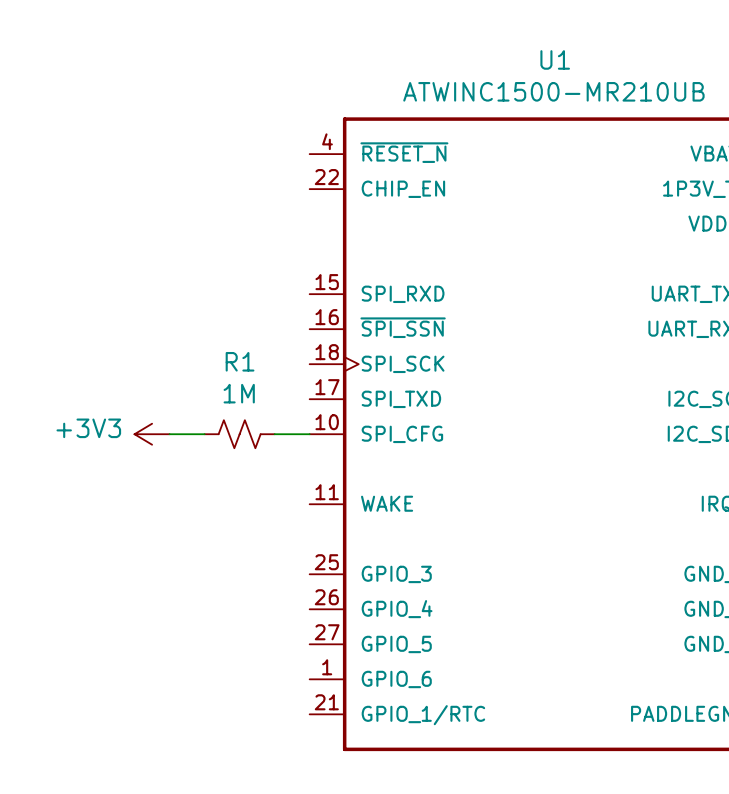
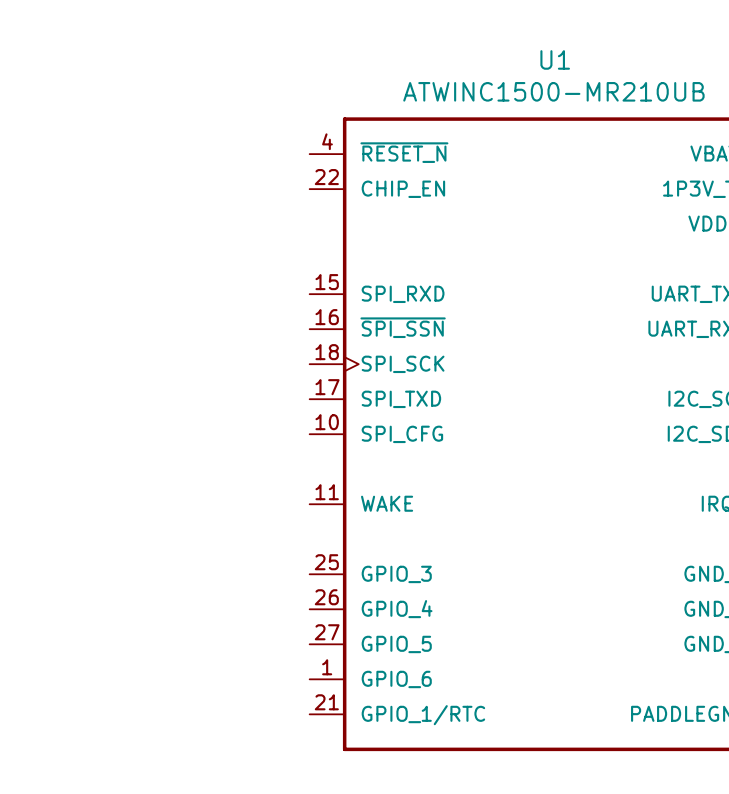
power symbol: +3V3 (152, 434) -> none
wire: (169, 434) (204, 434) -> none
R1: 1M (239, 434) -> none
wire: (274, 434) (309, 434) -> none

